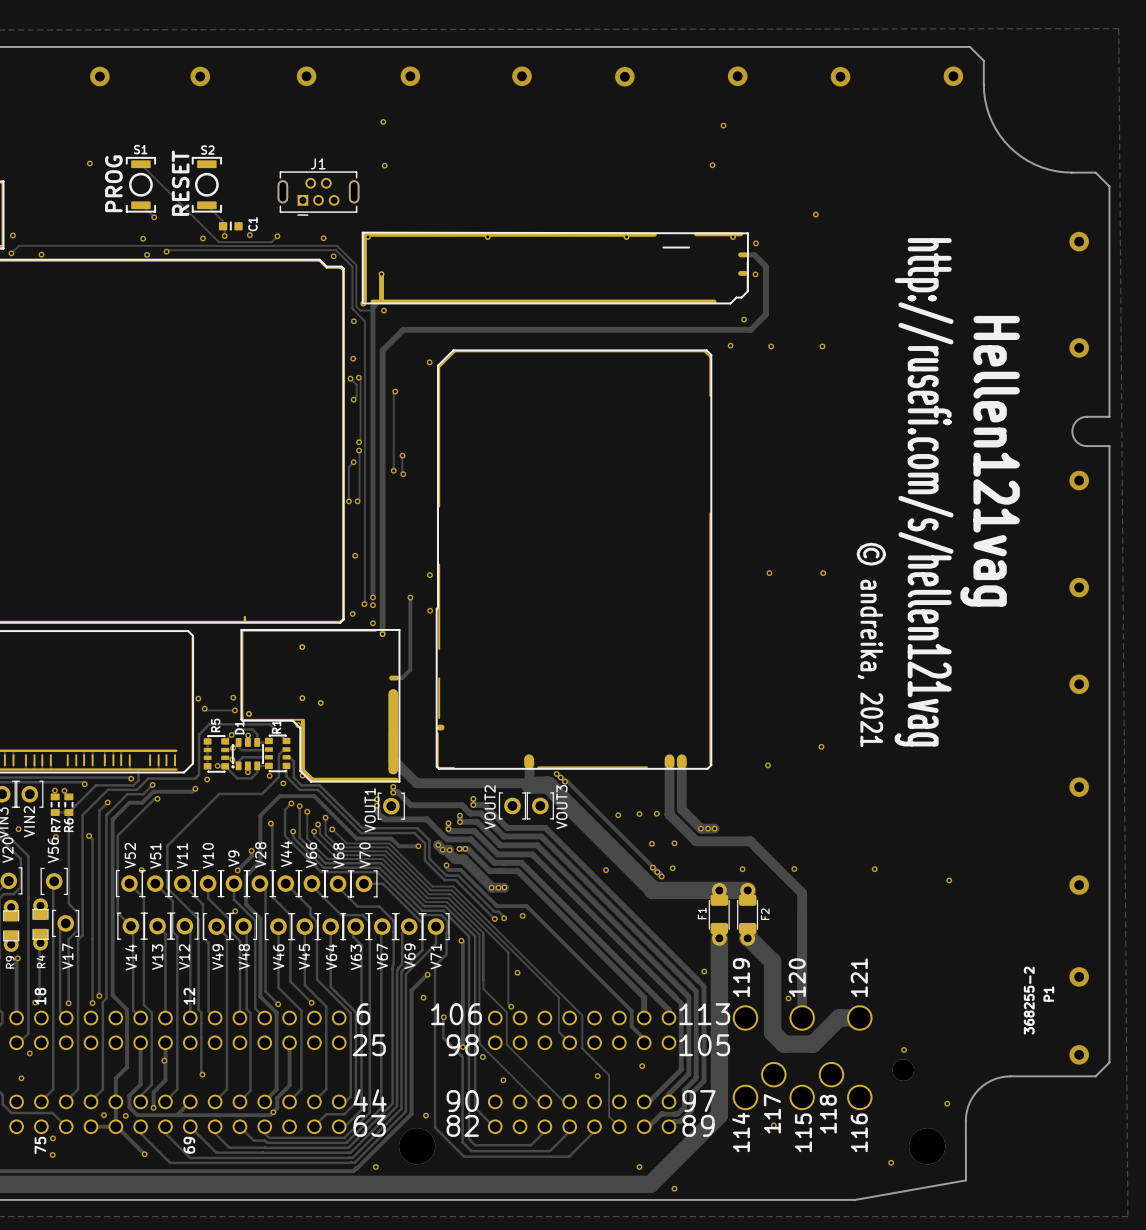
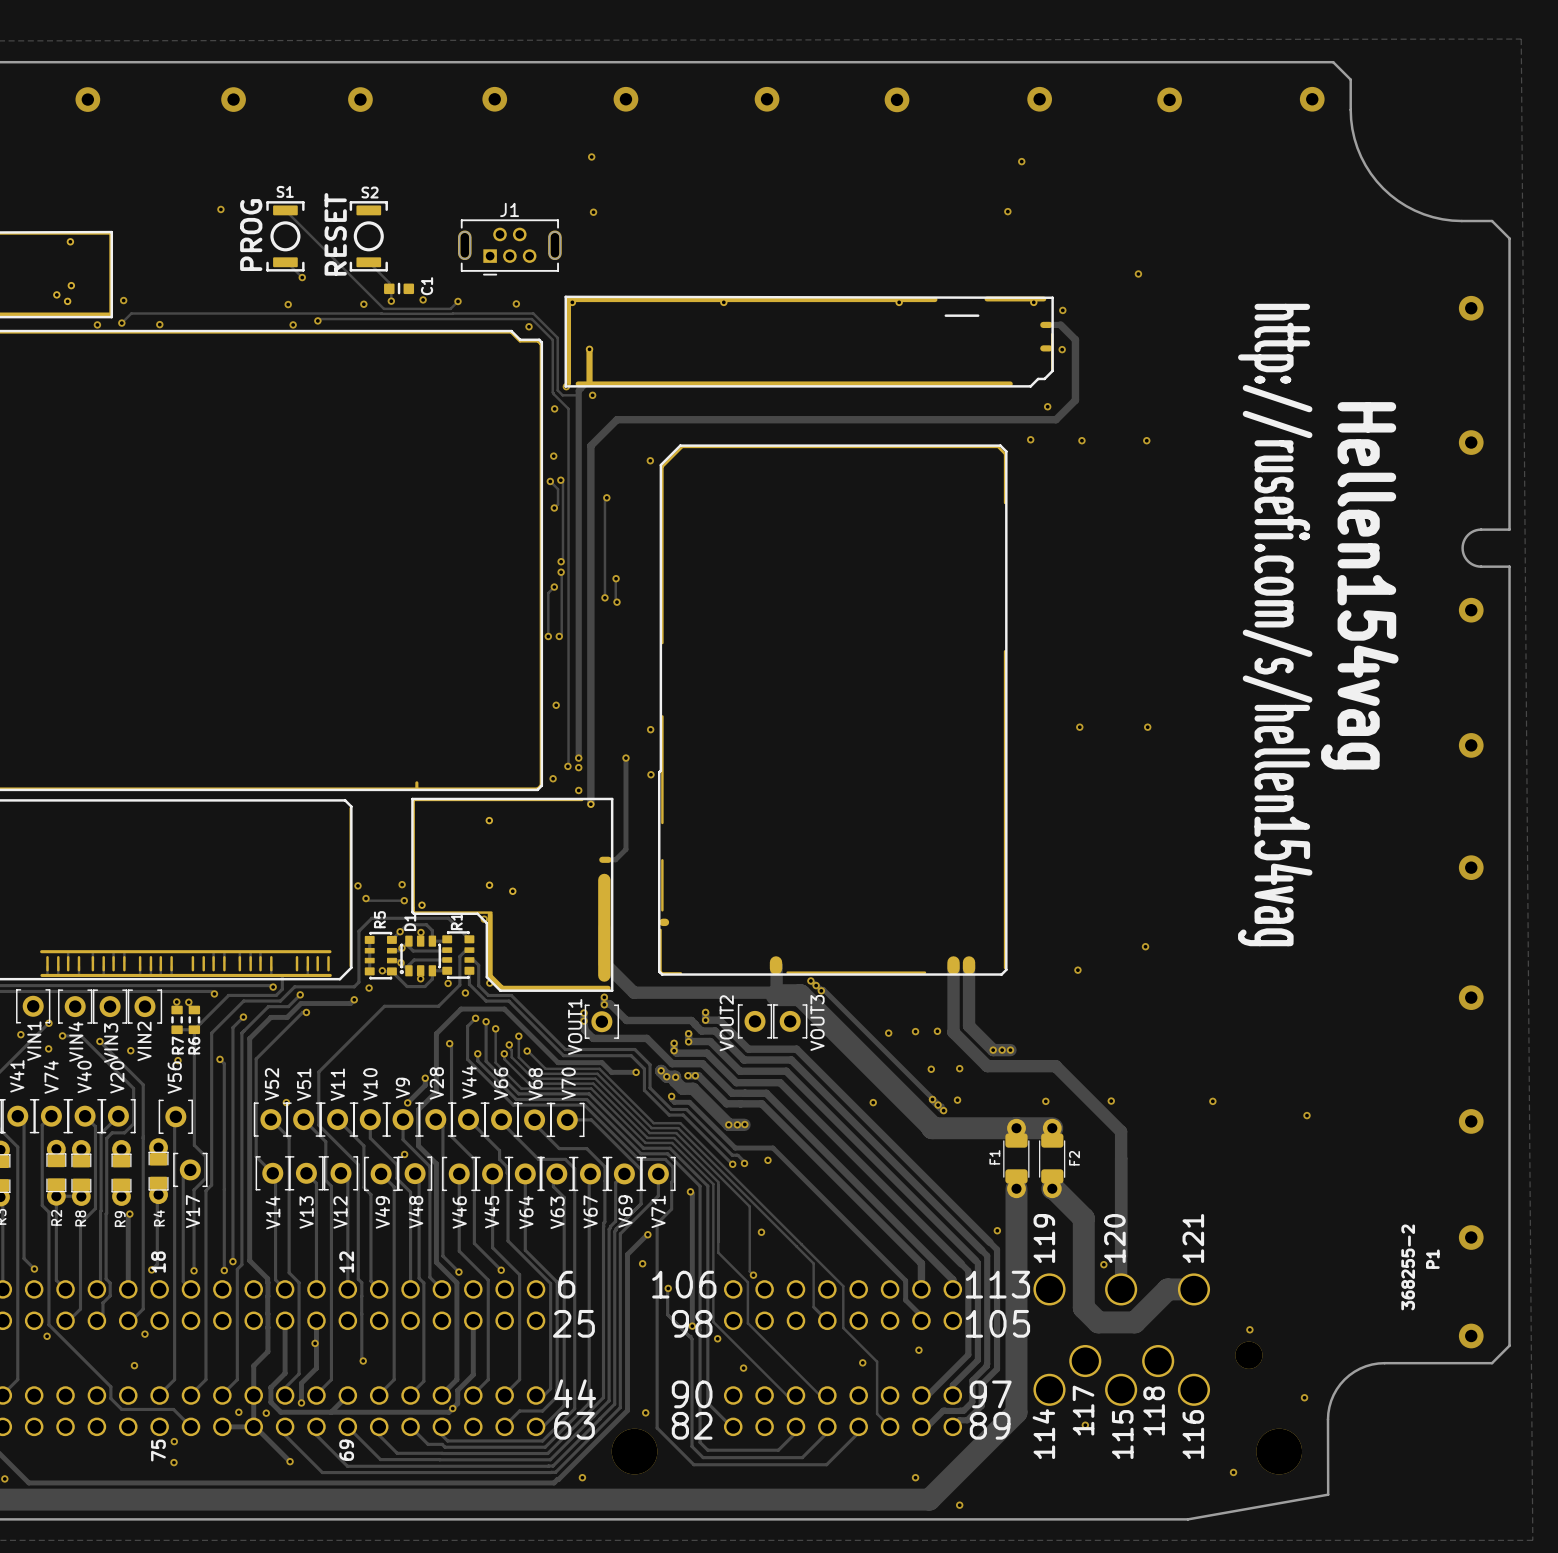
text: Hellen121vag (990, 461) -> Hellen154vag (1359, 585)
text: http://rusefi.com/s/hellen121vag (924, 492) -> http://rusefi.com/s/hellen154vag (1275, 625)
text: © andreika, 2021 (871, 644) -> none

